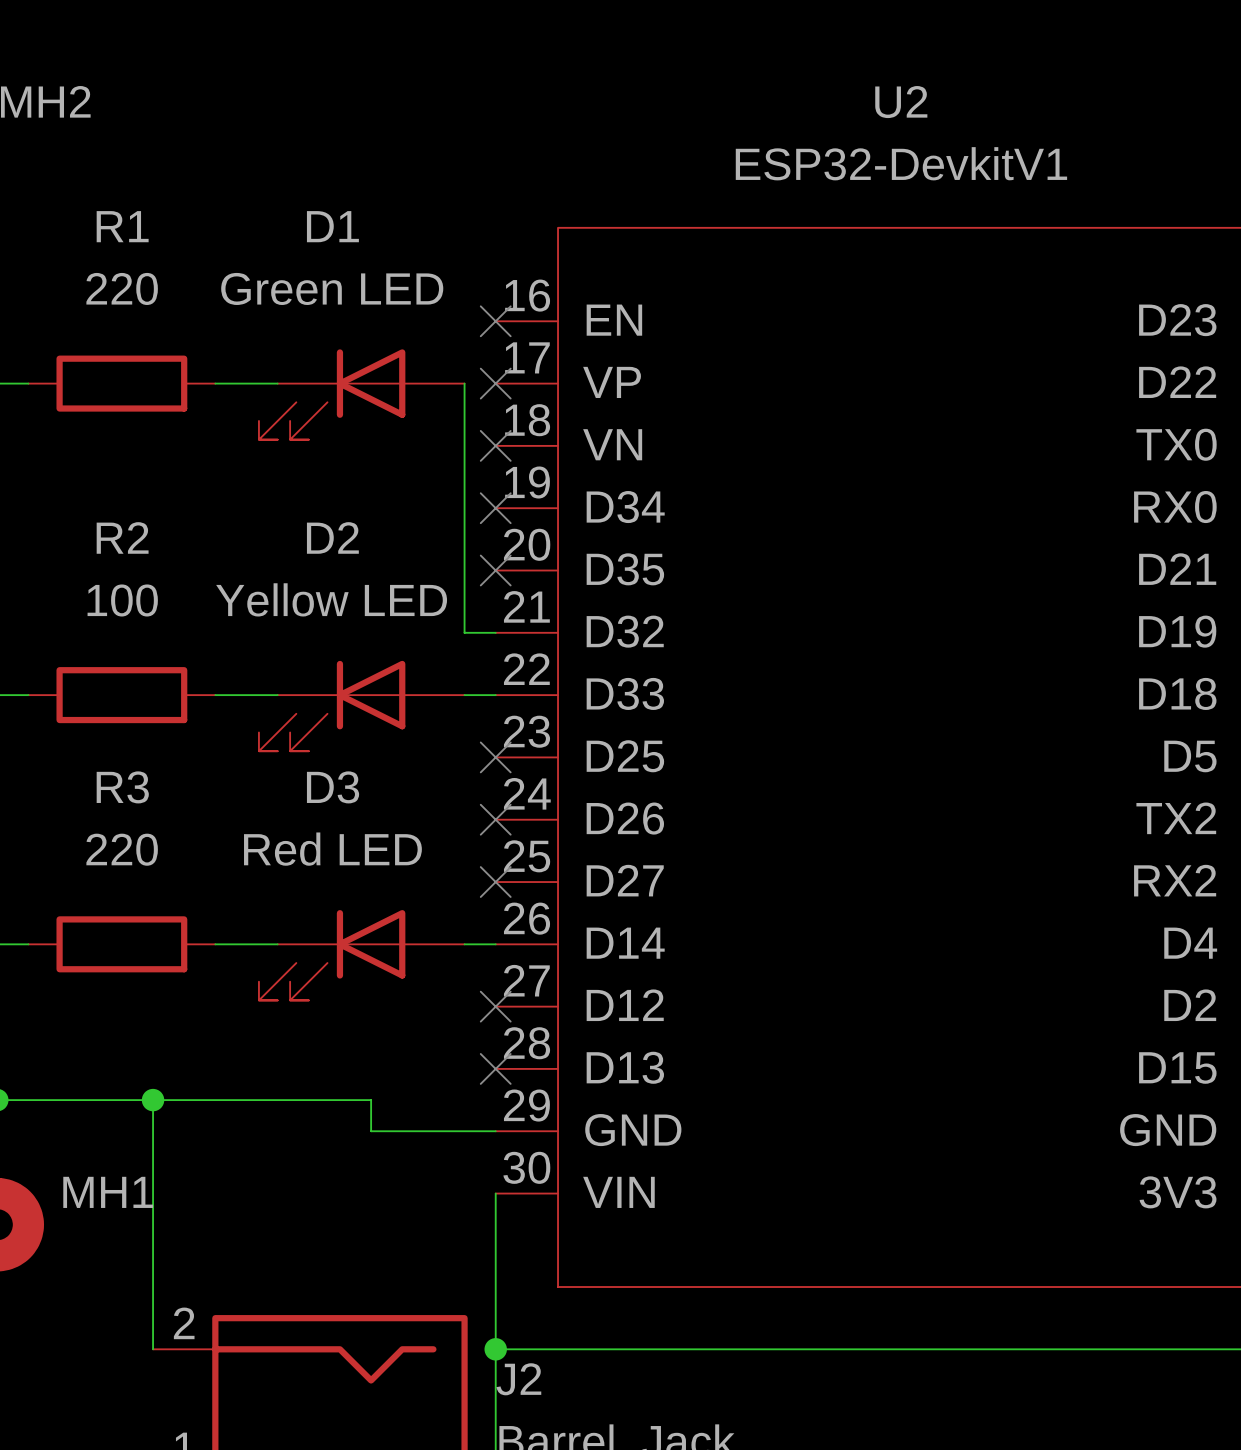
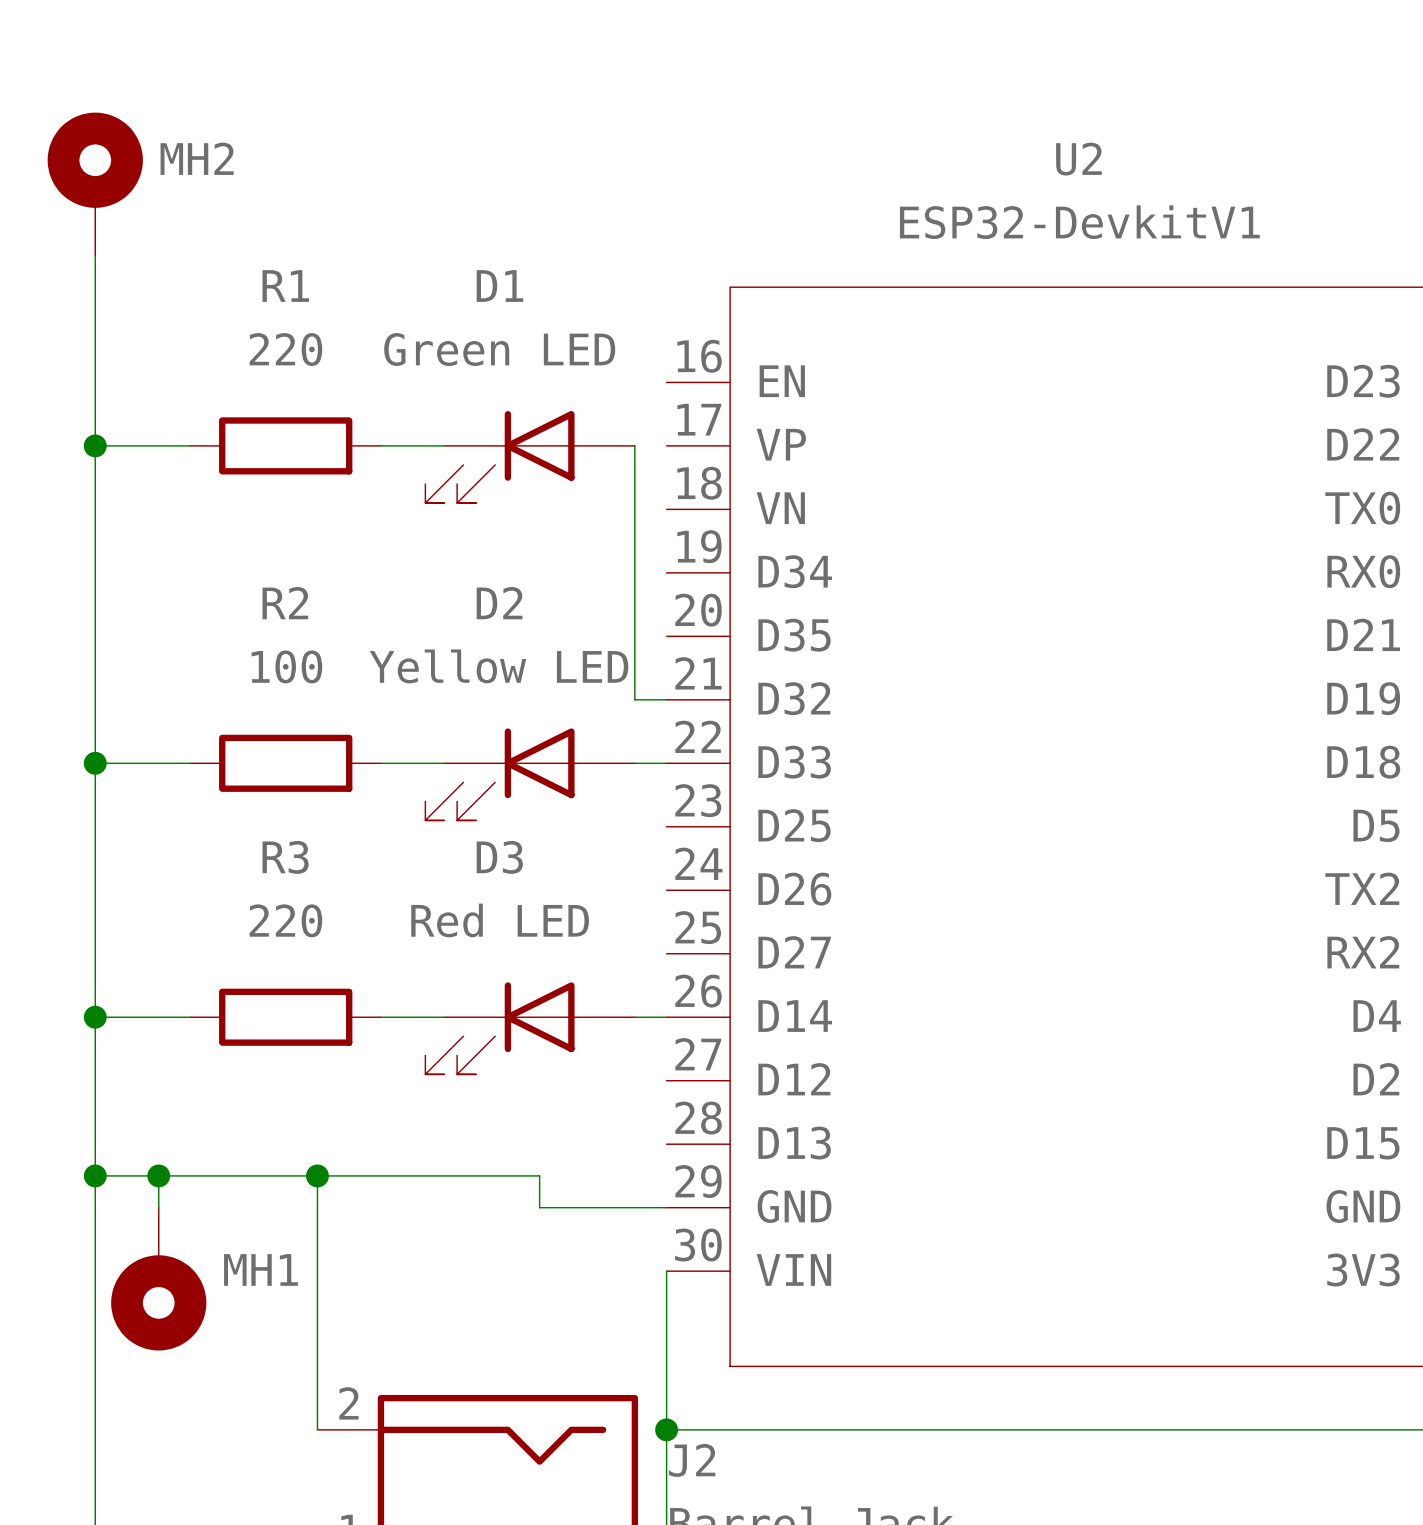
no-connect mark: (495, 321) -> none
no-connect mark: (495, 383) -> none
no-connect mark: (495, 445) -> none
no-connect mark: (495, 508) -> none
no-connect mark: (495, 570) -> none
no-connect mark: (495, 757) -> none
no-connect mark: (495, 819) -> none
no-connect mark: (495, 882) -> none
no-connect mark: (495, 1006) -> none
no-connect mark: (495, 1068) -> none

